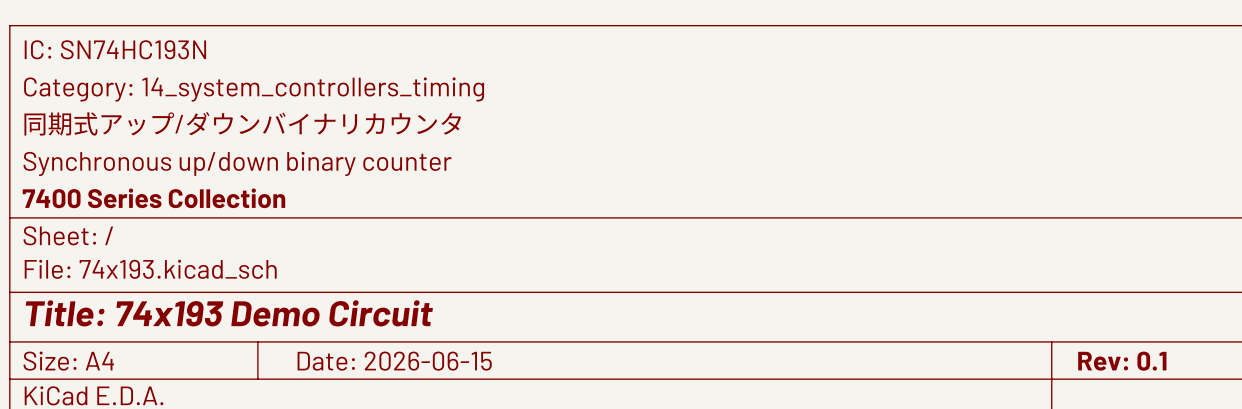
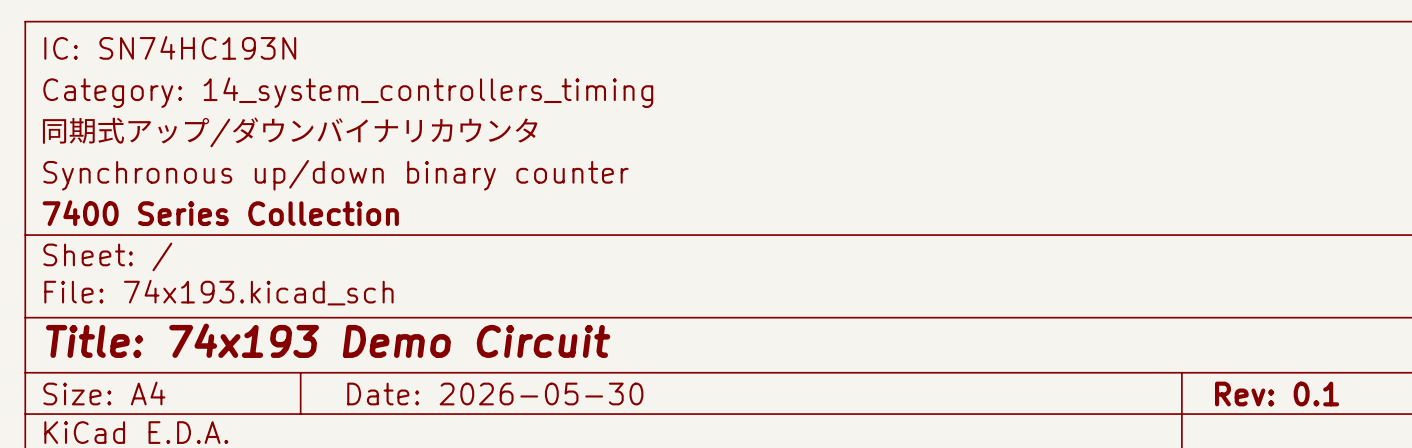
title block: Date: 2026-06-15 (394, 361) -> Date: 2026-05-30 (495, 394)

